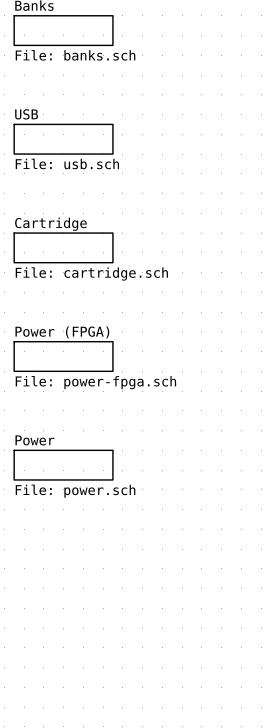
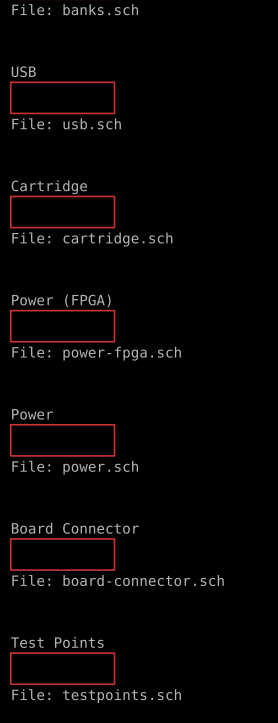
sheet Board Connector: none -> File: board-connector.sch (62, 554)
sheet Test Points: none -> File: testpoints.sch (62, 668)

